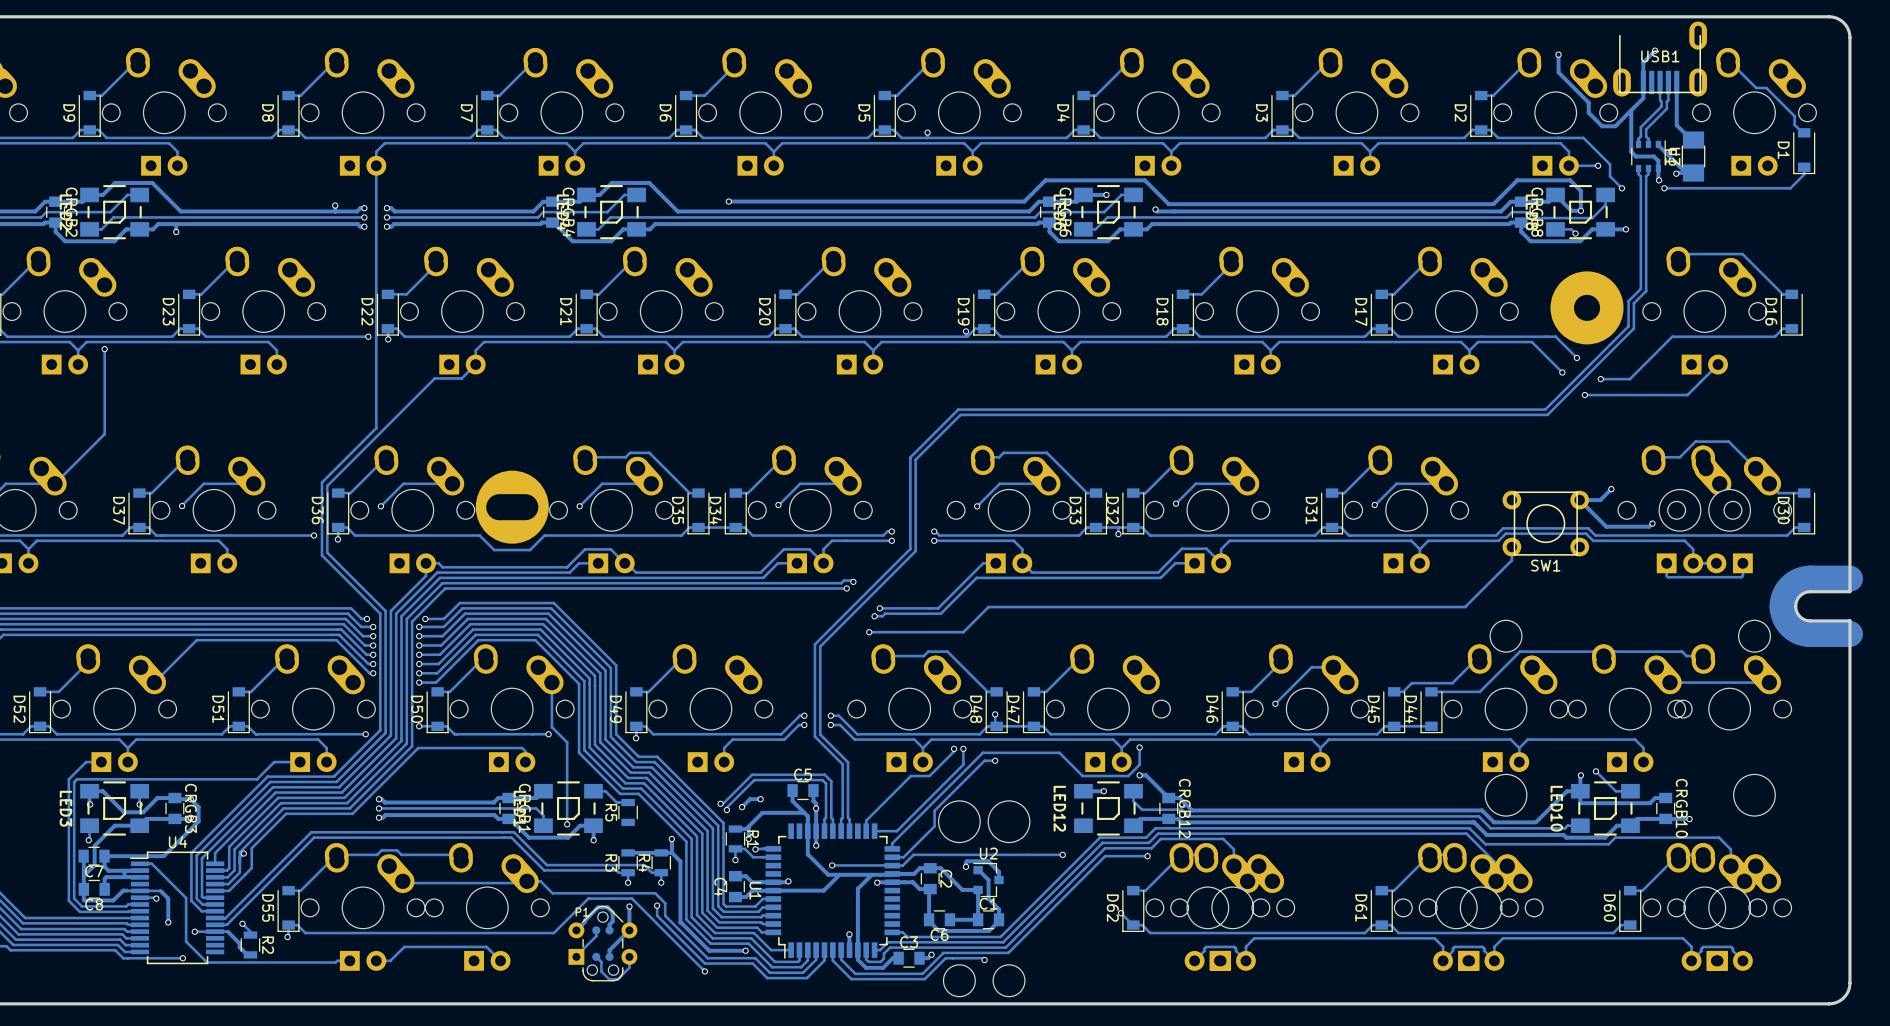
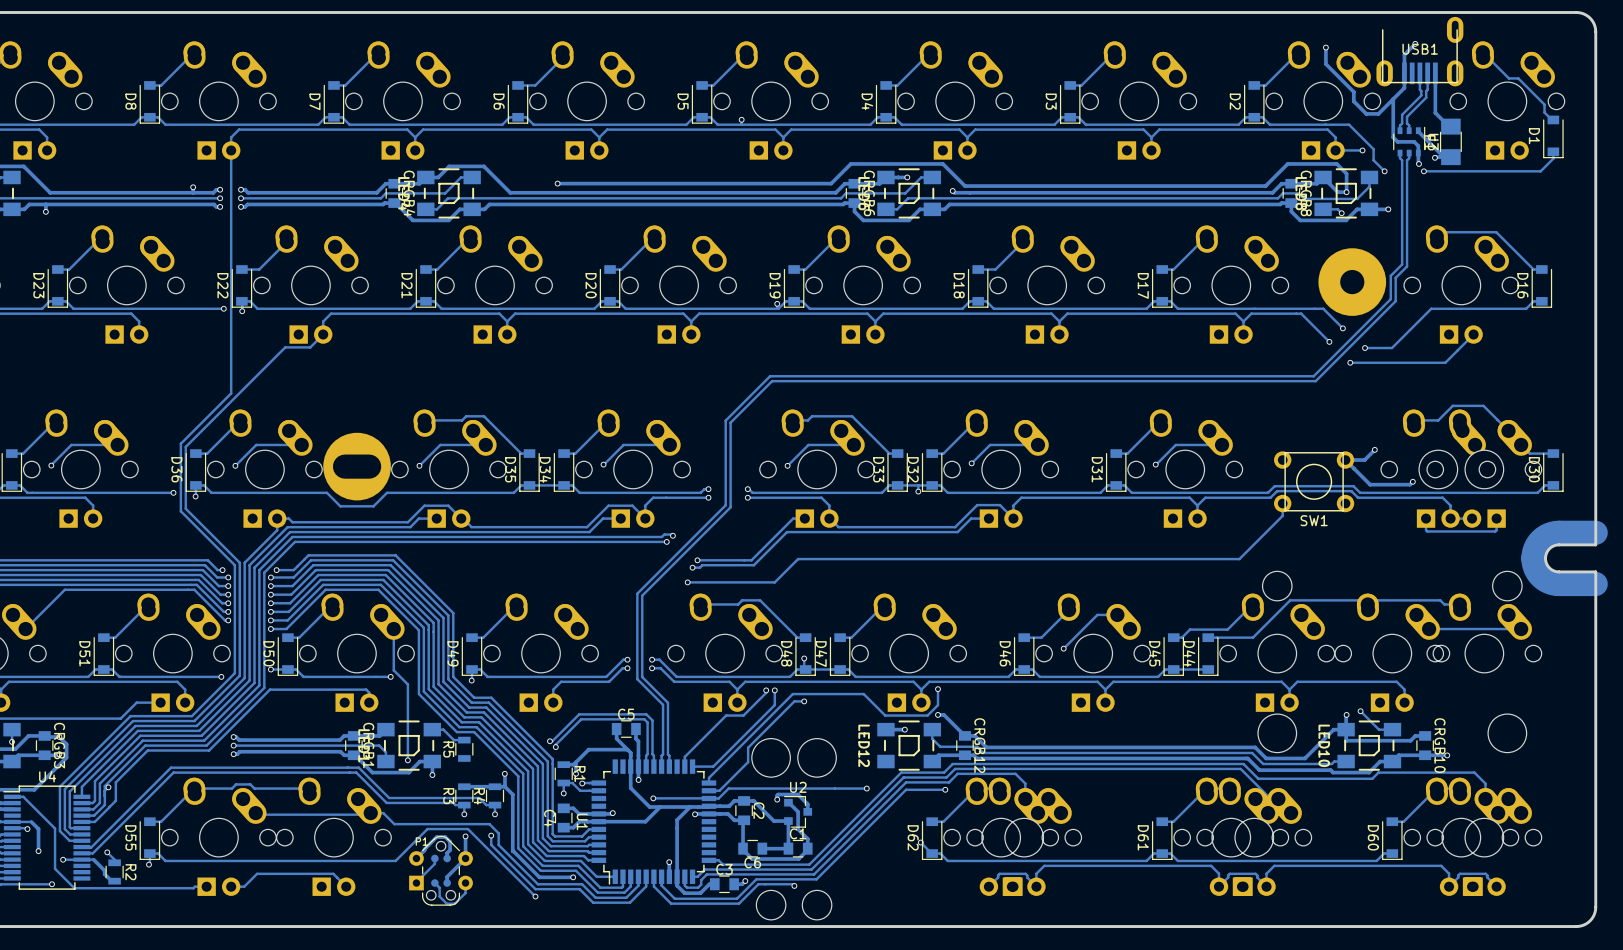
track: (760, 799) (750, 799) (742, 807) -> none
via: (760, 799) -> none
via: (742, 807) -> none
via: (816, 808) -> none

